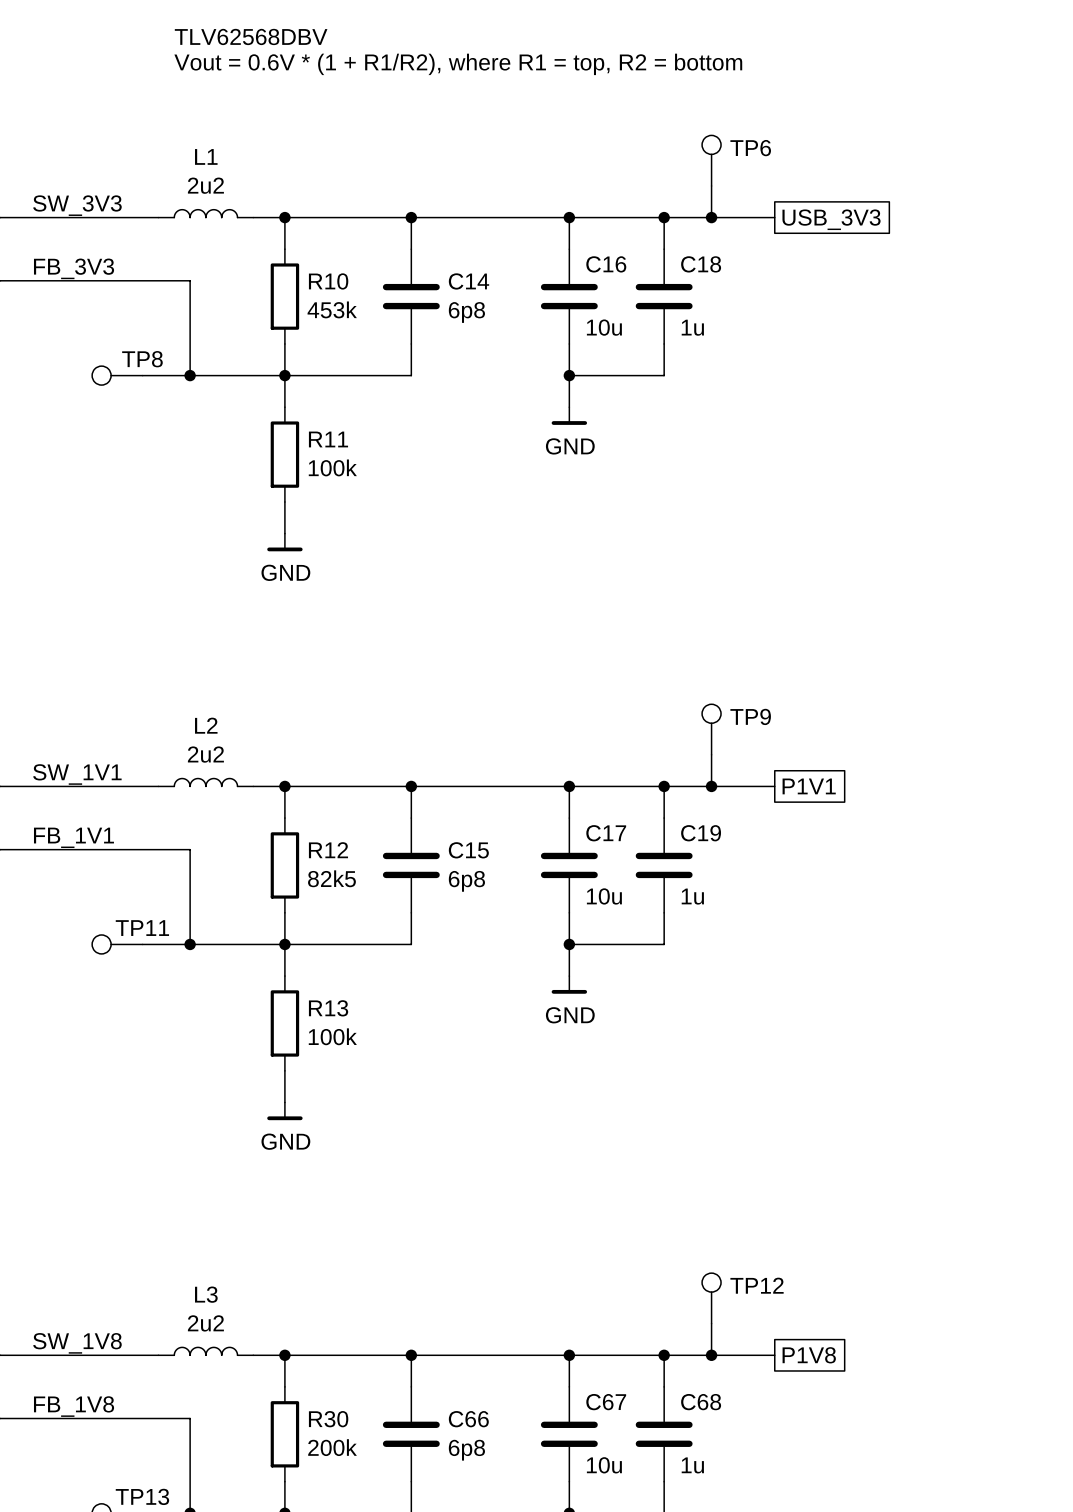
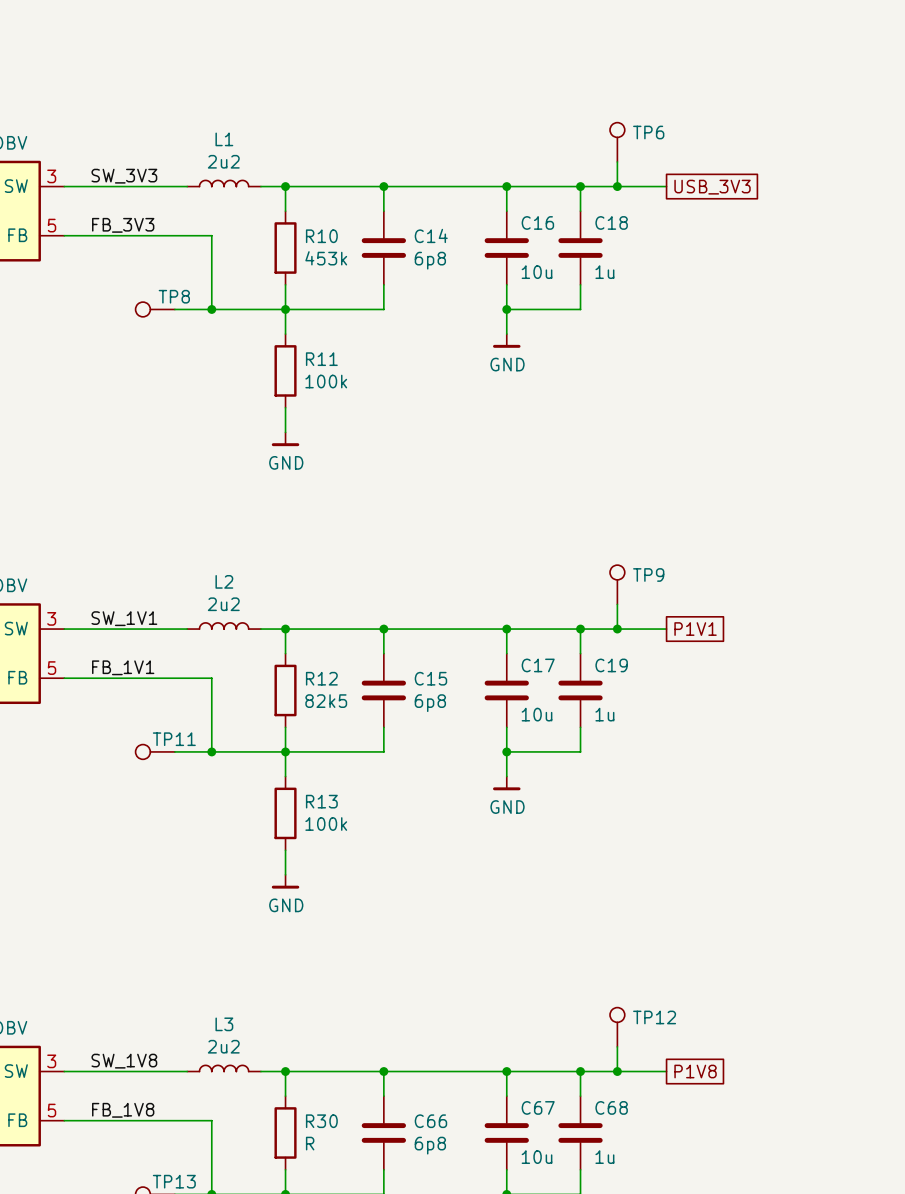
text: TLV62568DBV (251, 36) -> none
text: Vout = 0.6V * (1 + R1/R2), where R1 = top, R2 = bottom (458, 64) -> none
R30 value: 200k (332, 1447) -> R (310, 1143)

